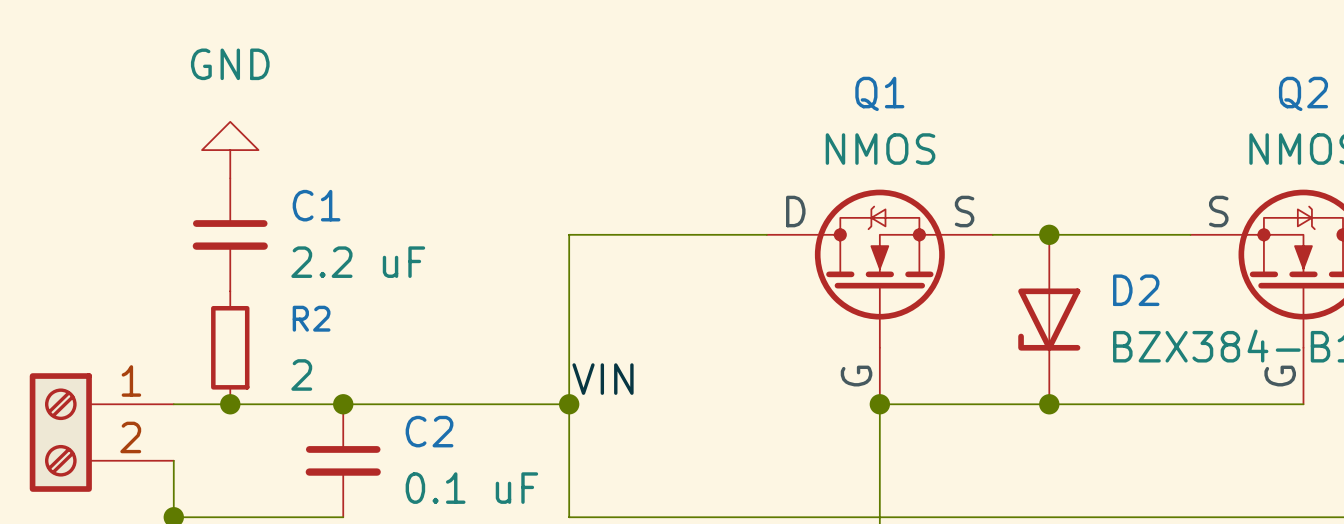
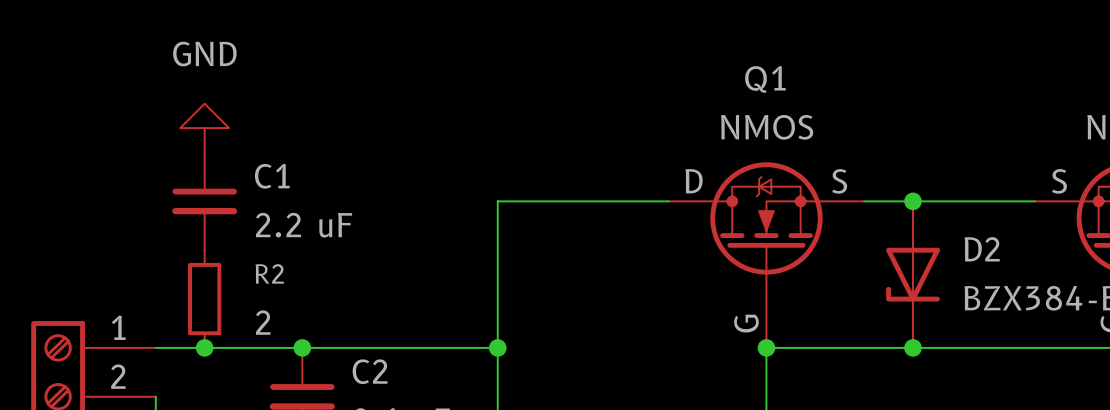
label: VIN (603, 379) -> none

